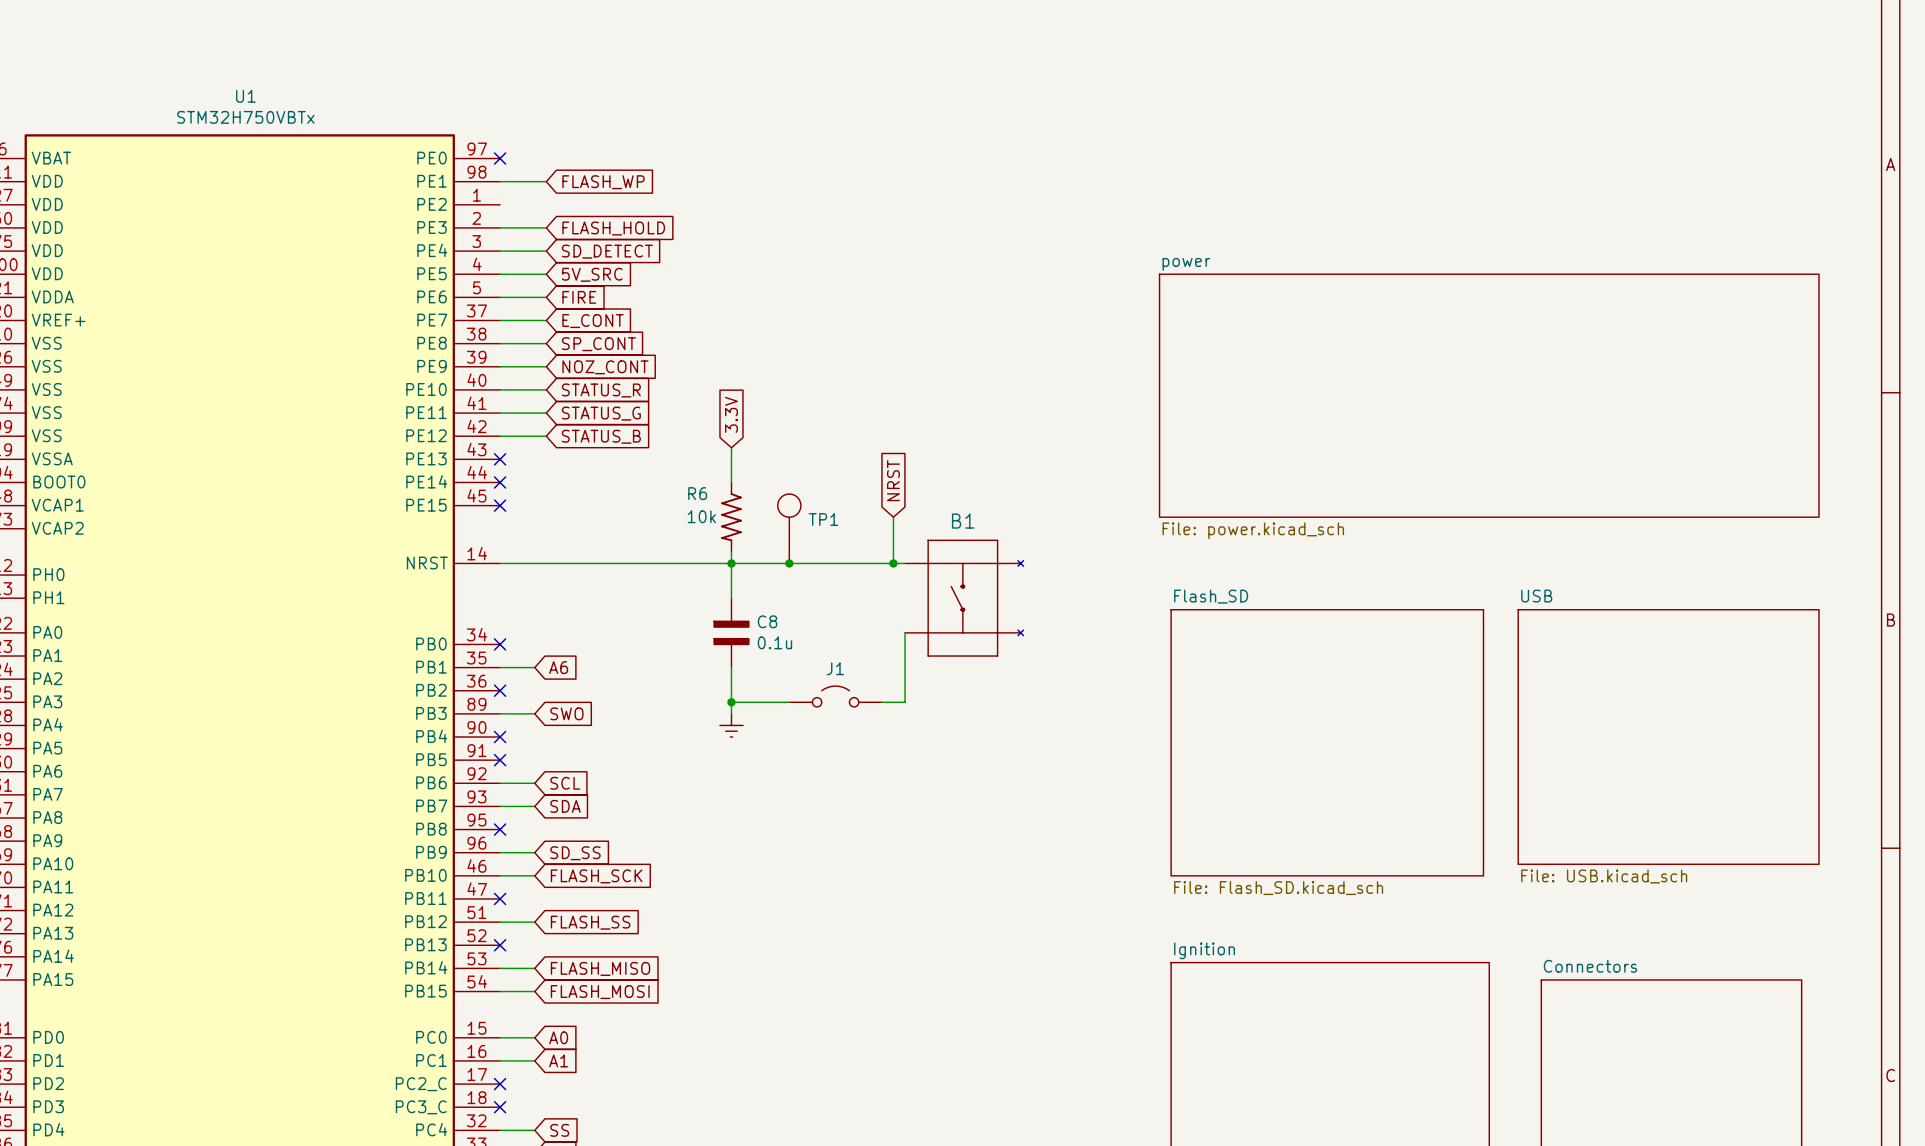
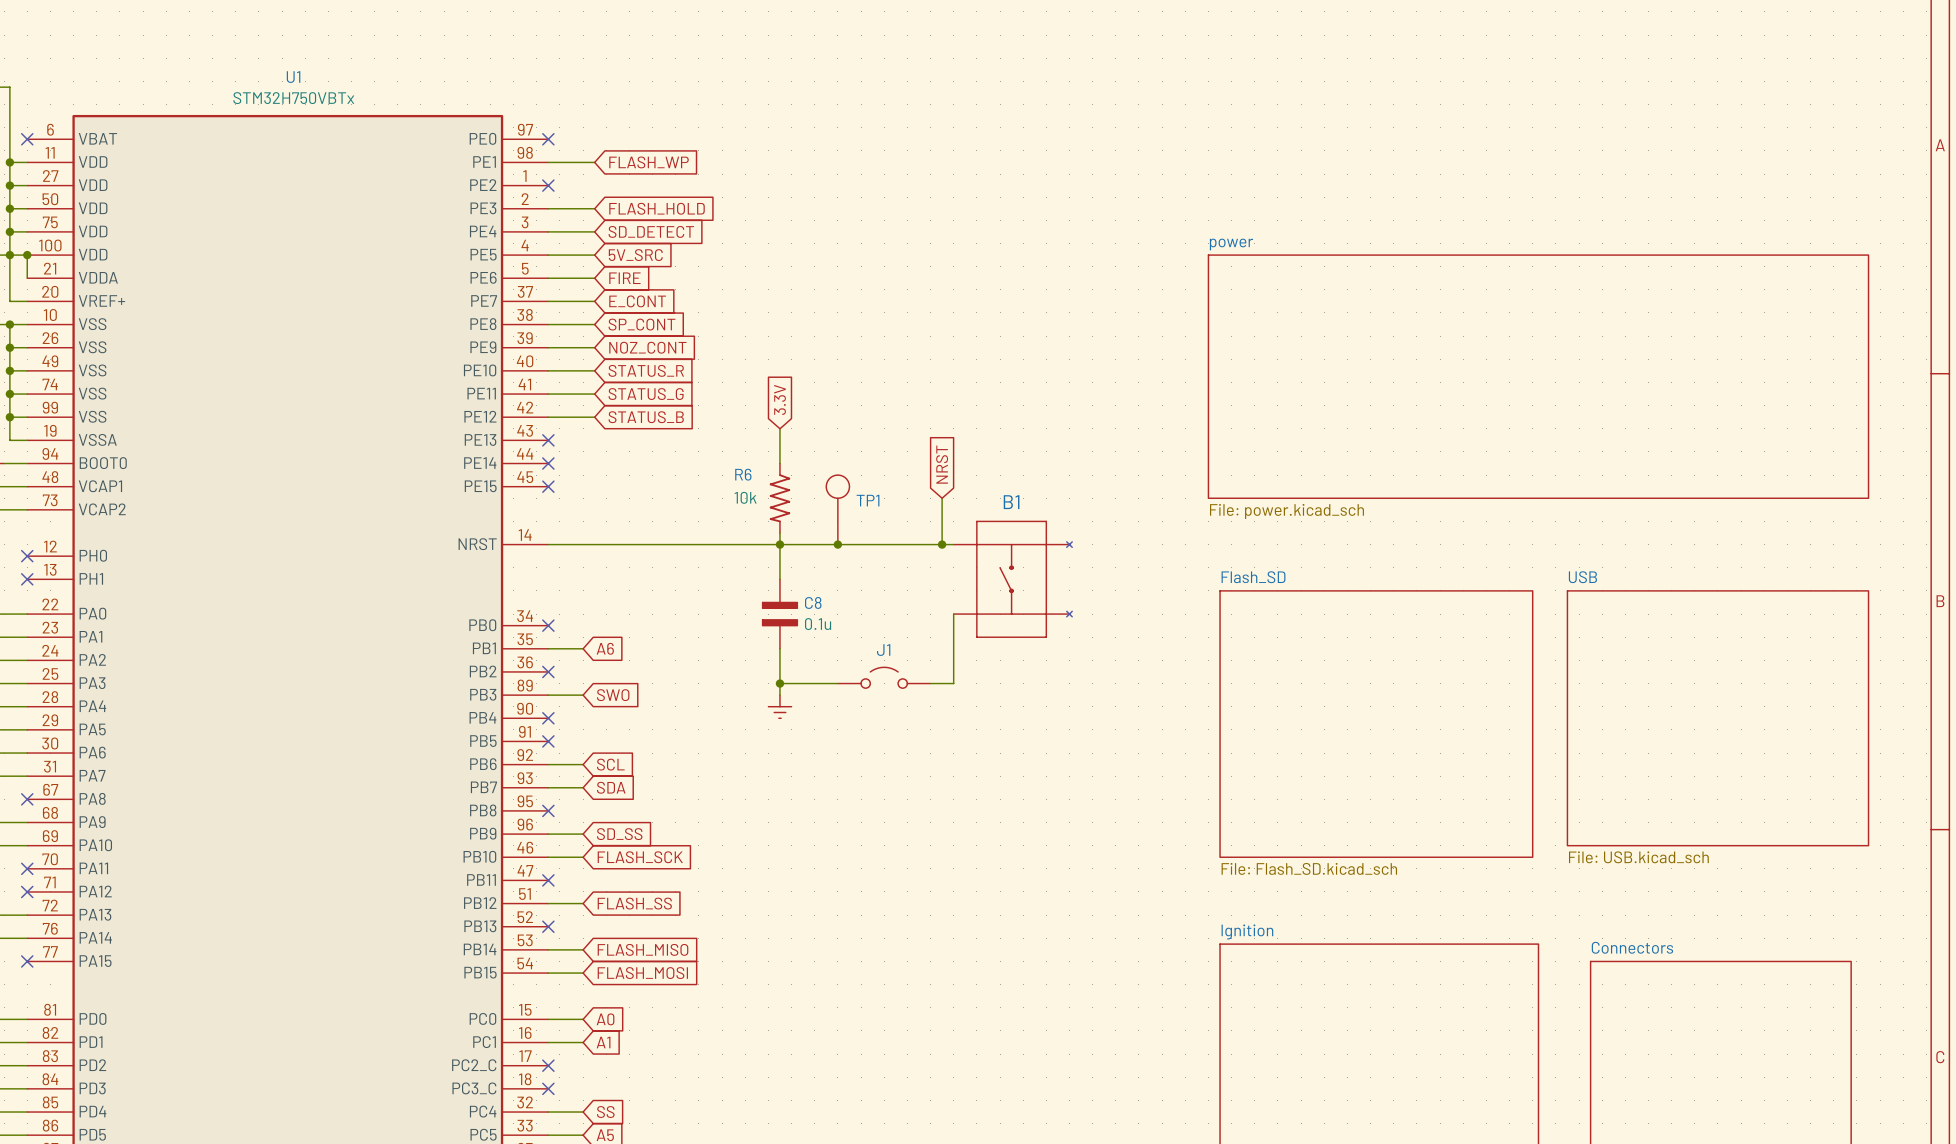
no-connect mark: none -> (548, 185)

